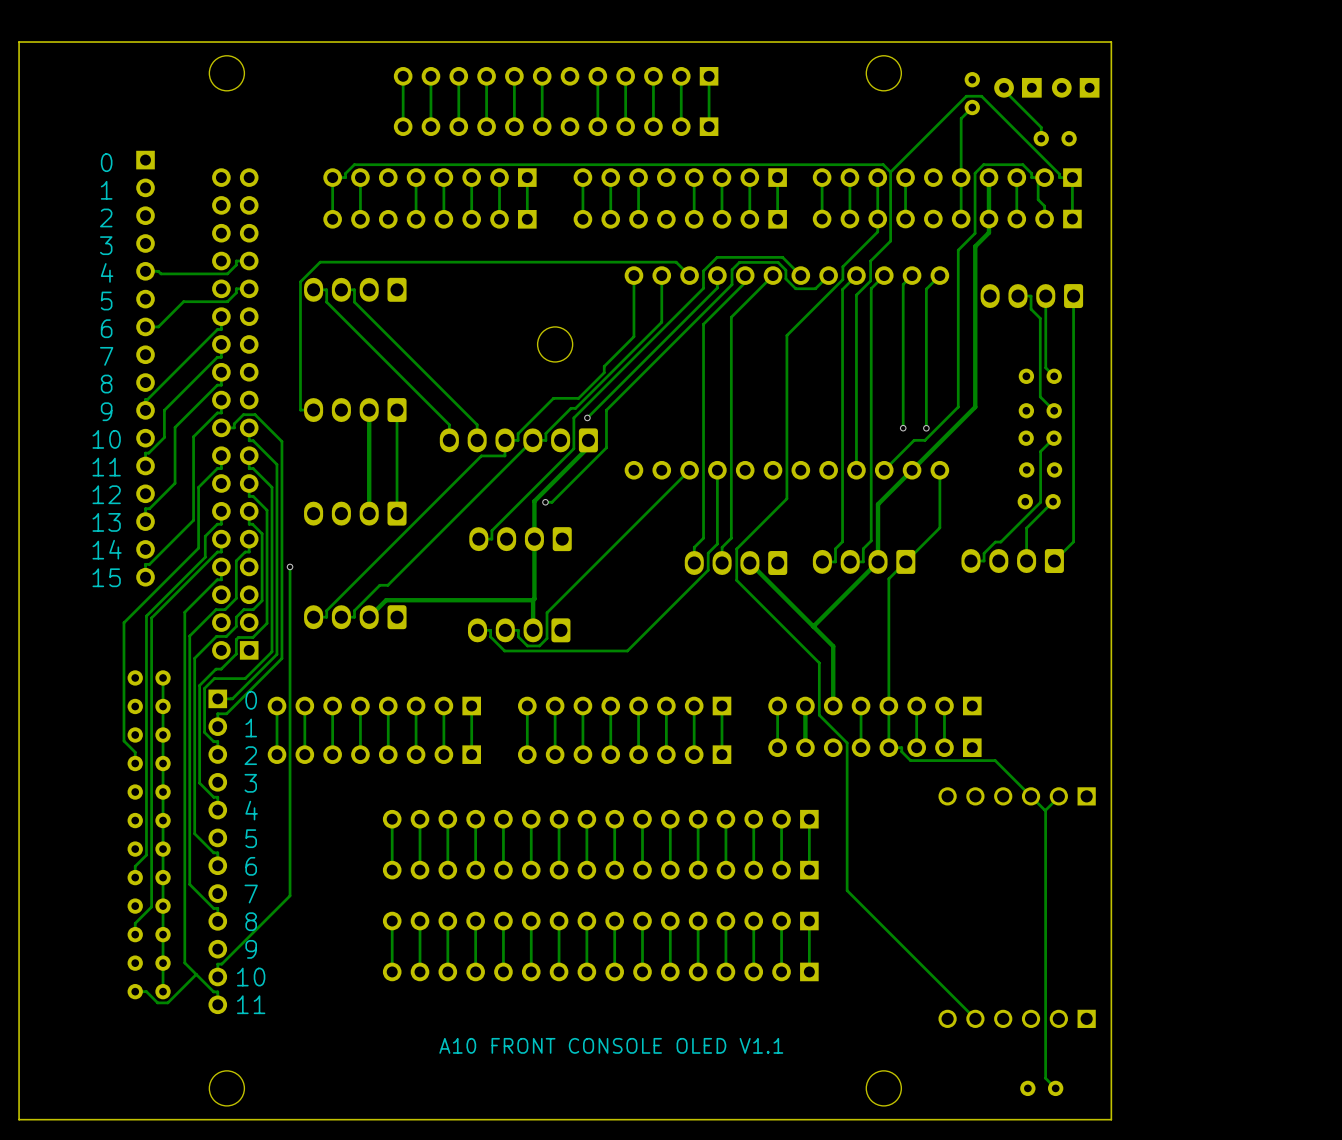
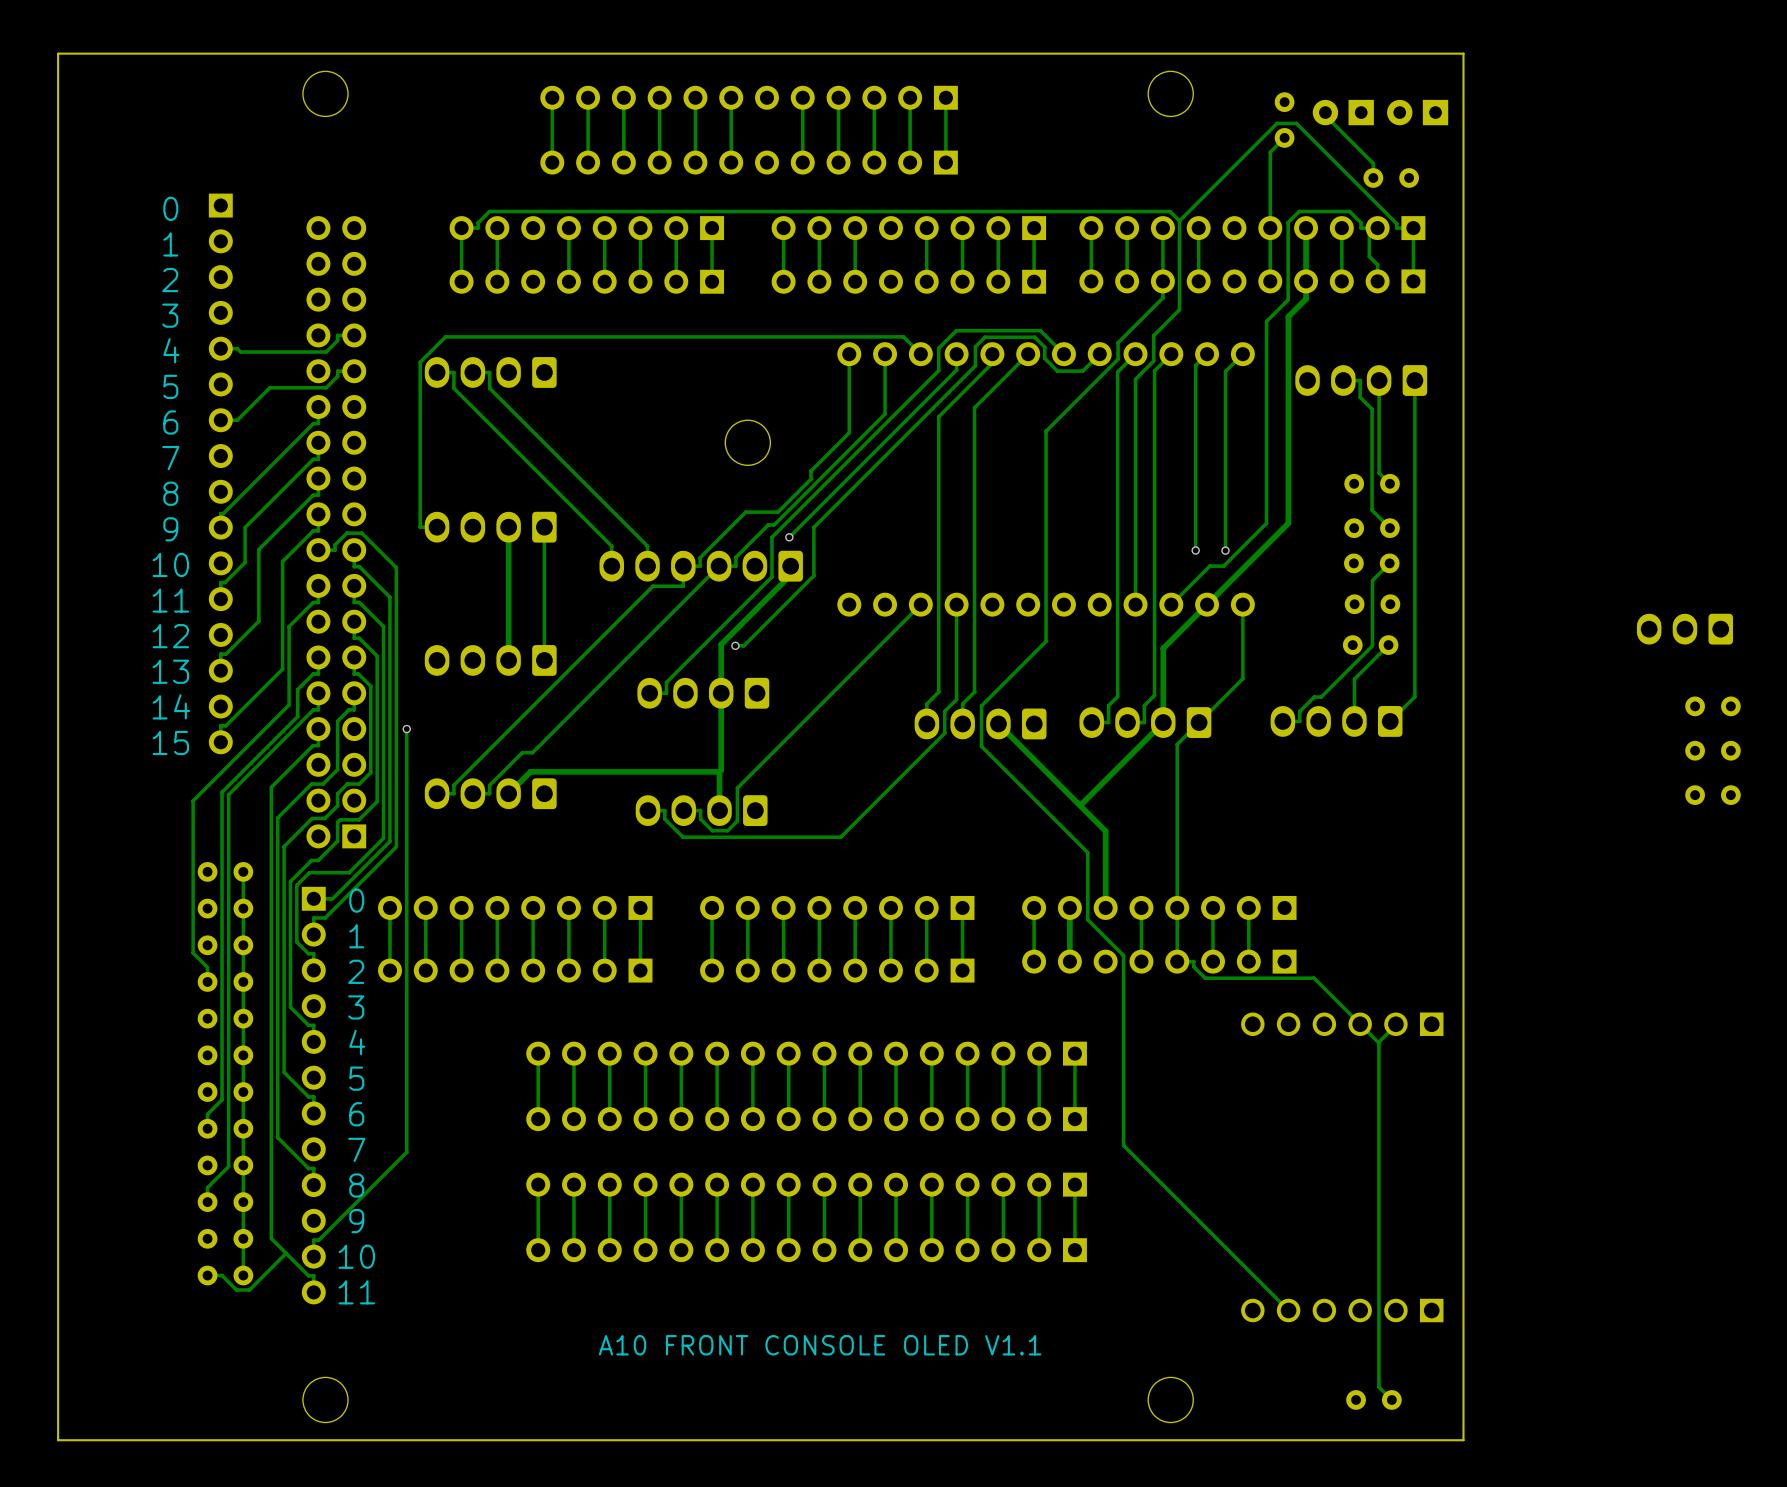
part: none -> (1684, 629)
part: none -> (1712, 706)
part: none -> (1712, 750)
part: none -> (1712, 795)

